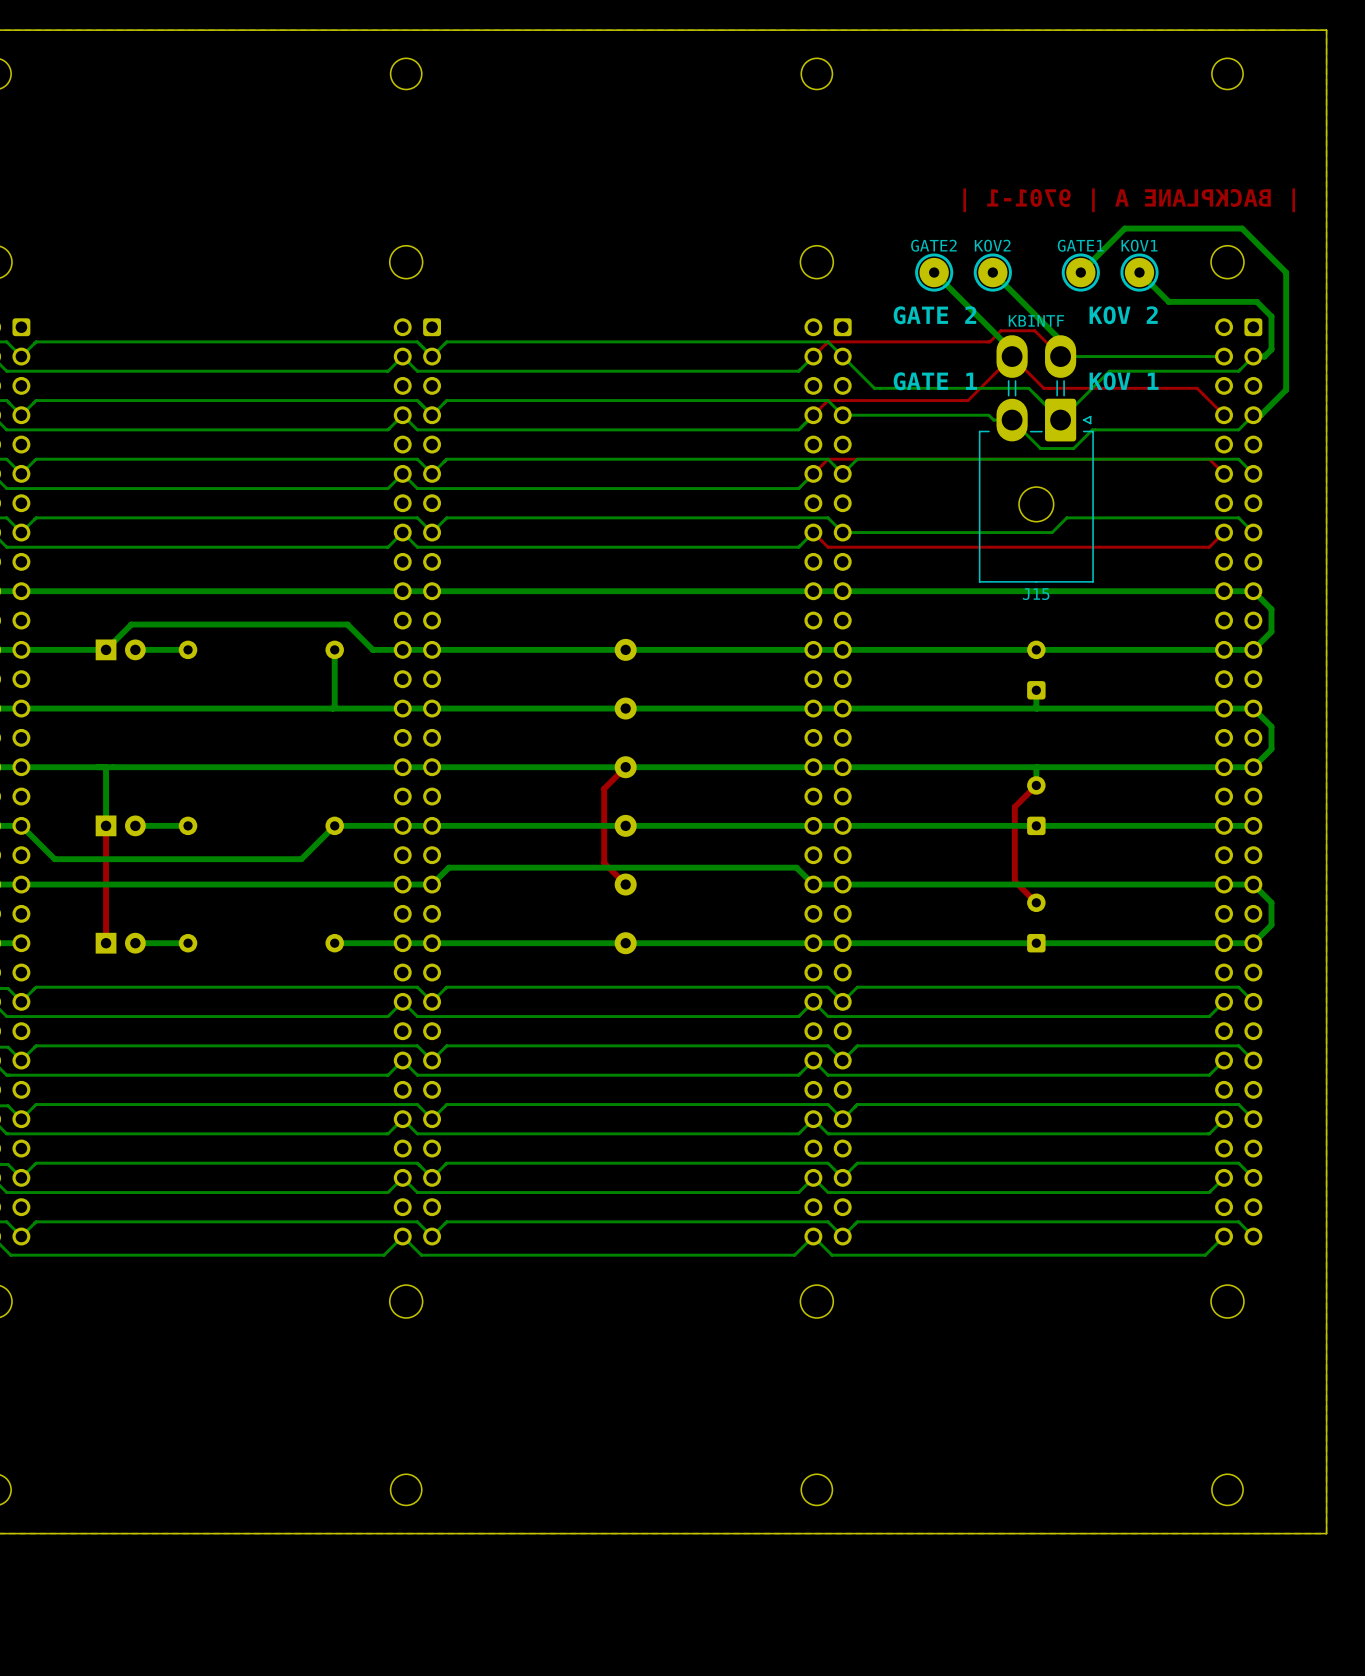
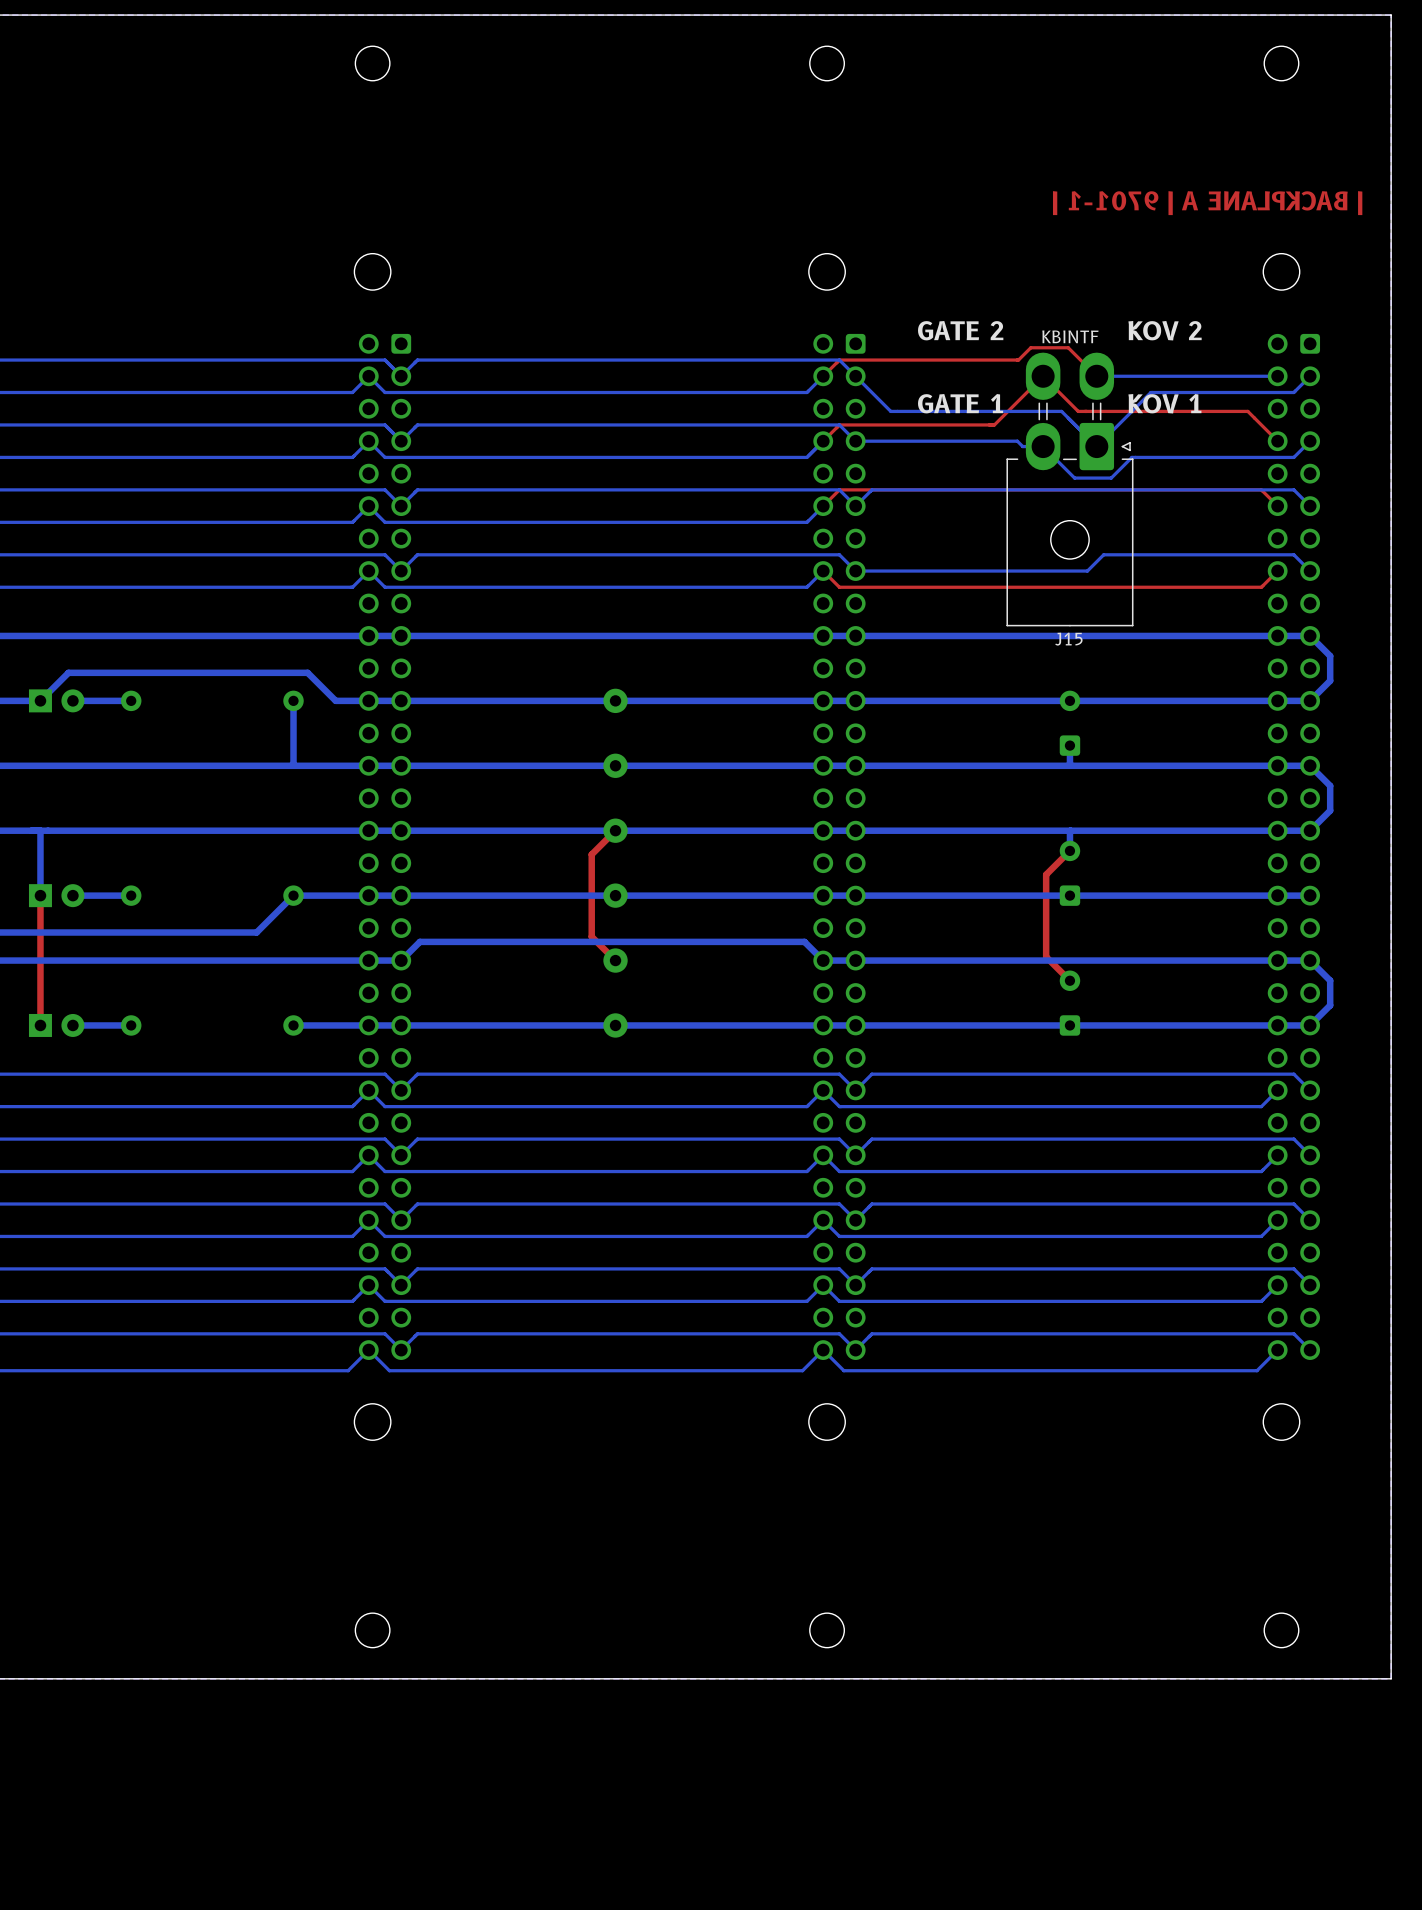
bottom track: (934, 272) (1012, 350) (1012, 356) -> none
part: GATE2 (934, 272) -> none
bottom track: (992, 272) (1060, 340) (1060, 356) -> none
part: KOV2 (992, 272) -> none
bottom track: (1080, 272) (1124, 228) (1242, 228) (1286, 272) (1286, 389) (1260, 415) (1253, 415) -> none
part: GATE1 (1080, 272) -> none
bottom track: (1139, 272) (1168, 301) (1256, 301) (1271, 316) (1271, 349) (1264, 356) (1253, 356) -> none
part: KOV1 (1139, 272) -> none

